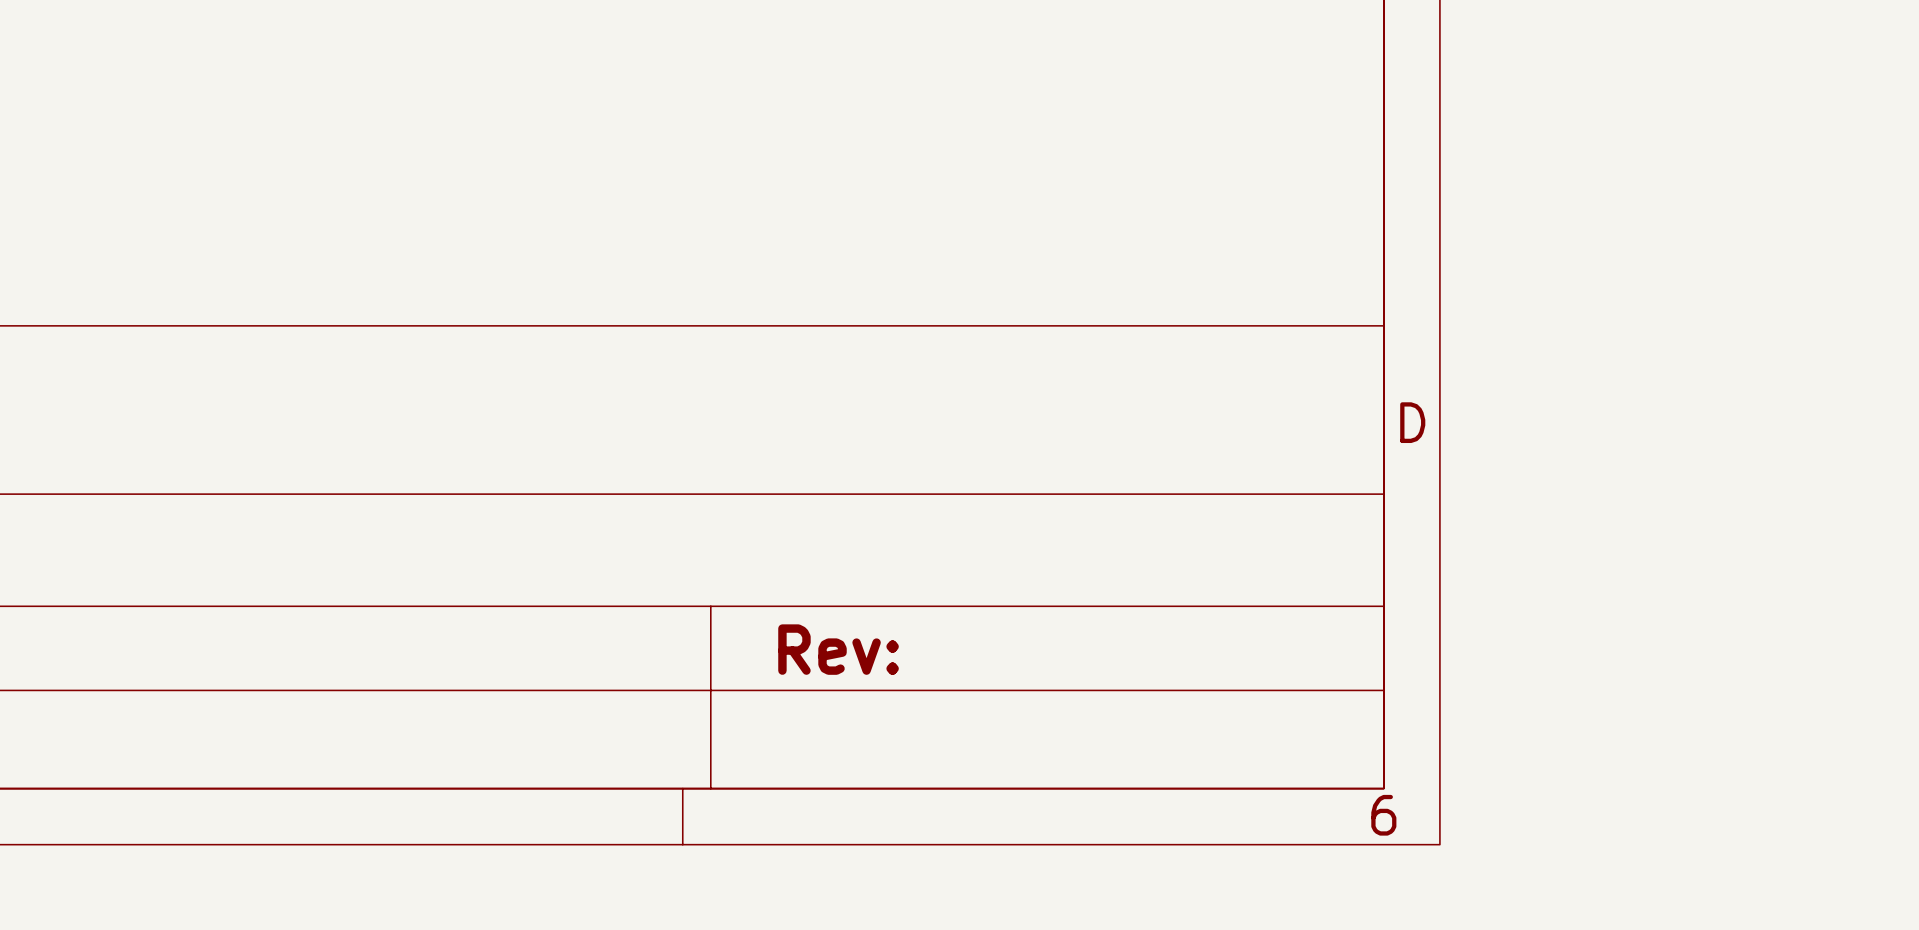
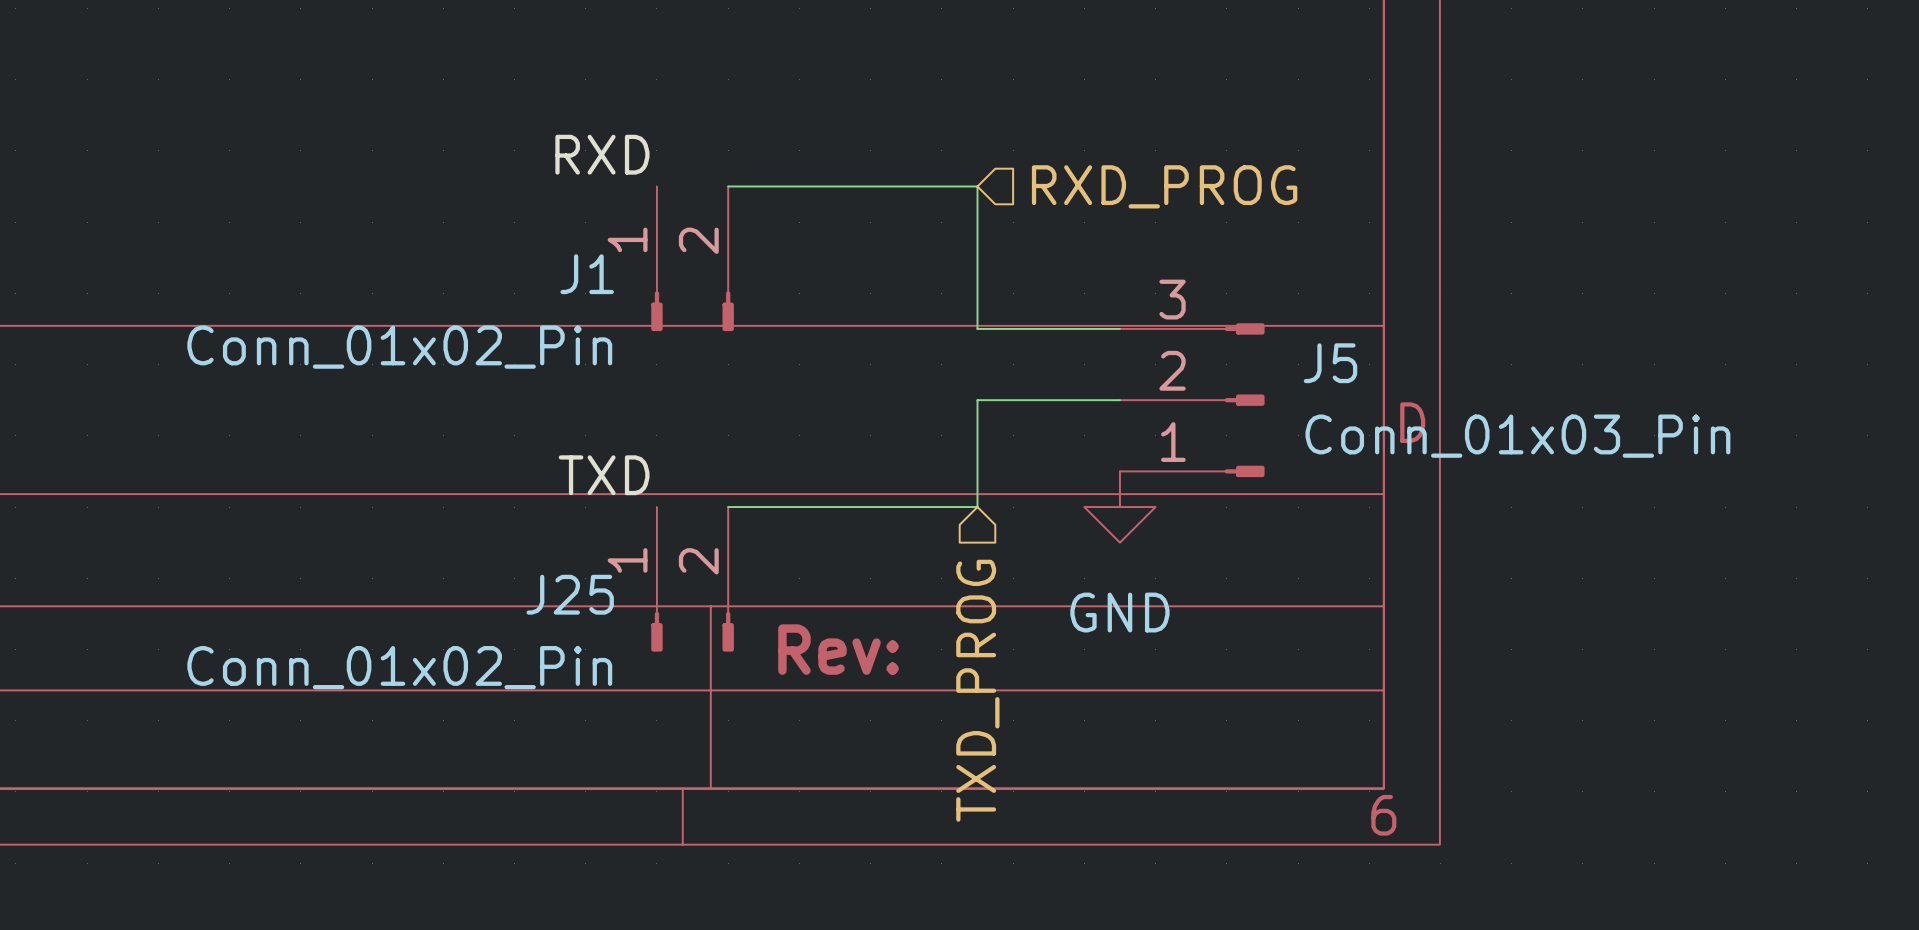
label: none -> RXD (602, 154)
wire: none -> (728, 186) (977, 186) (977, 328) (1119, 328)
hierarchical label: none -> RXD_PROG (1164, 186)
J1: none -> Conn_01x02_Pin (692, 258)
wire: none -> (1119, 400) (977, 400) (977, 507) (728, 507)
J5: none -> Conn_01x03_Pin (1192, 400)
label: none -> TXD (604, 475)
power symbol: none -> GND (1119, 507)
J25: none -> Conn_01x02_Pin (692, 579)
hierarchical label: none -> TXD_PROG (977, 690)

